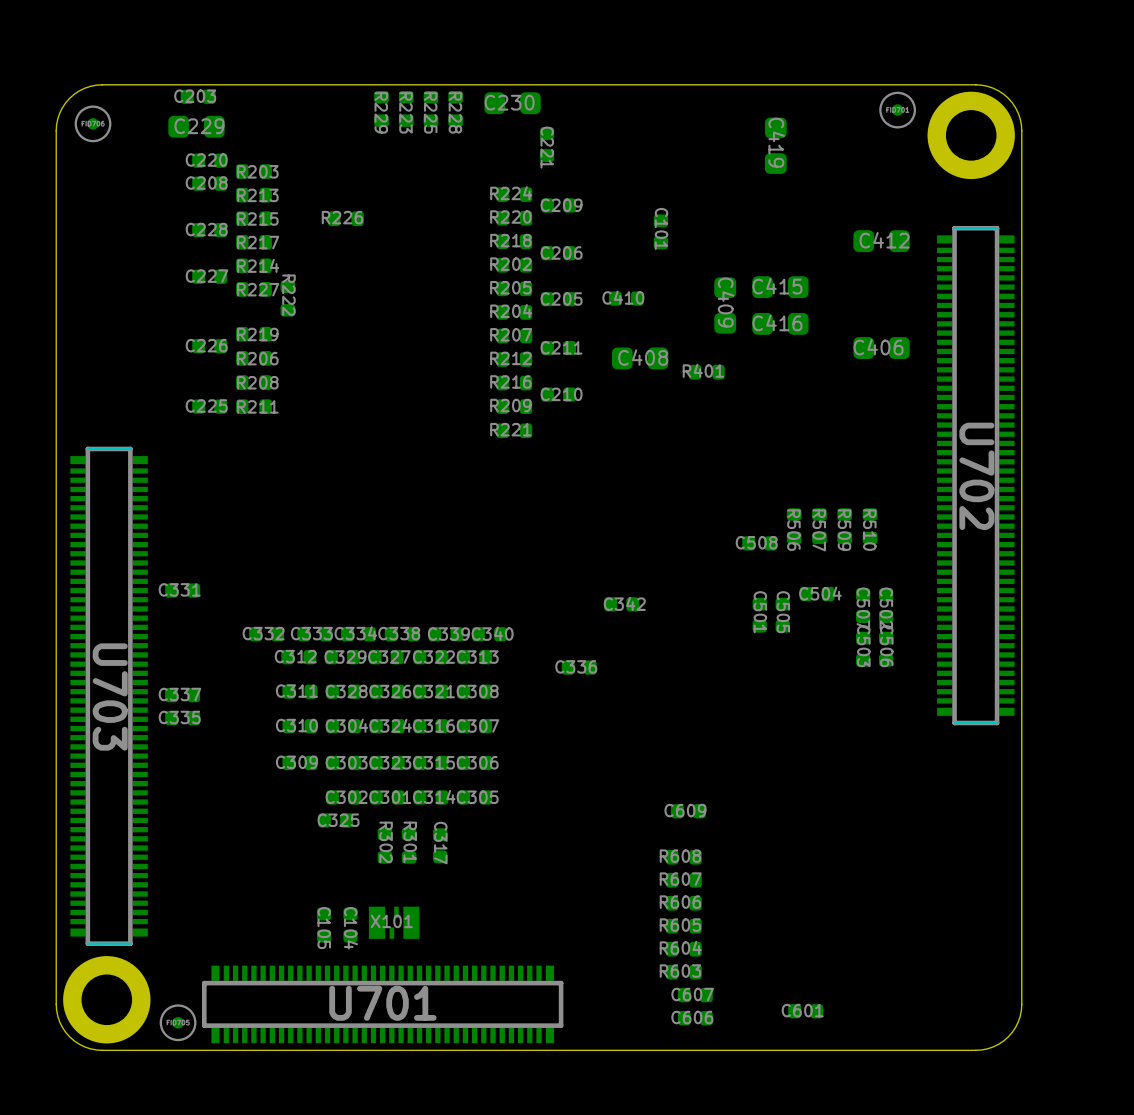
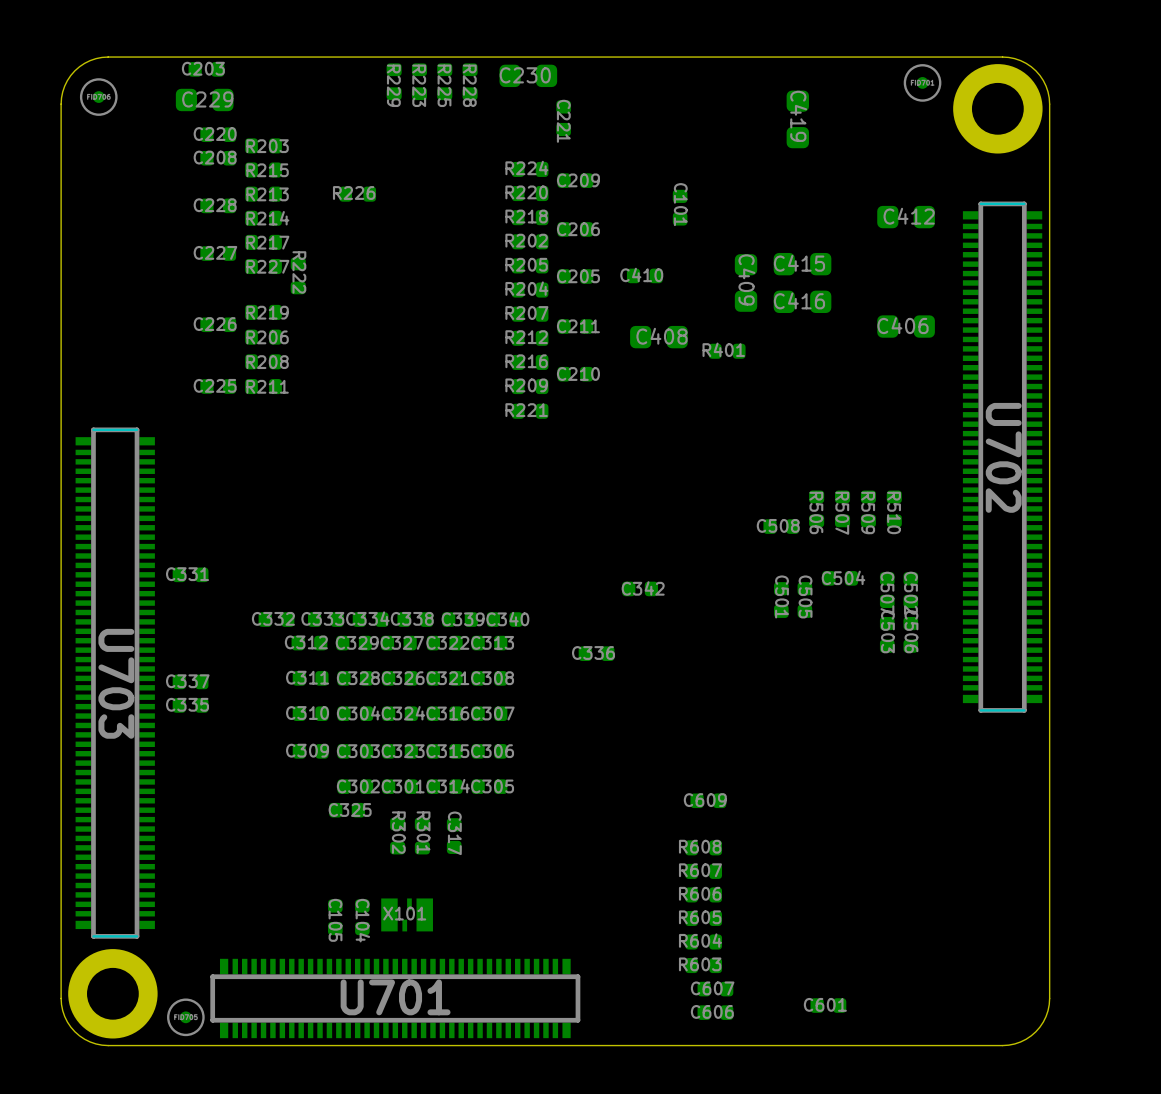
R213 name: R213 (257, 195) -> R215 (267, 170)
R215 name: R215 (257, 218) -> R213 (267, 194)
R217 name: R217 (258, 242) -> R214 (267, 218)
R214 name: R214 (258, 265) -> R217 (267, 242)

